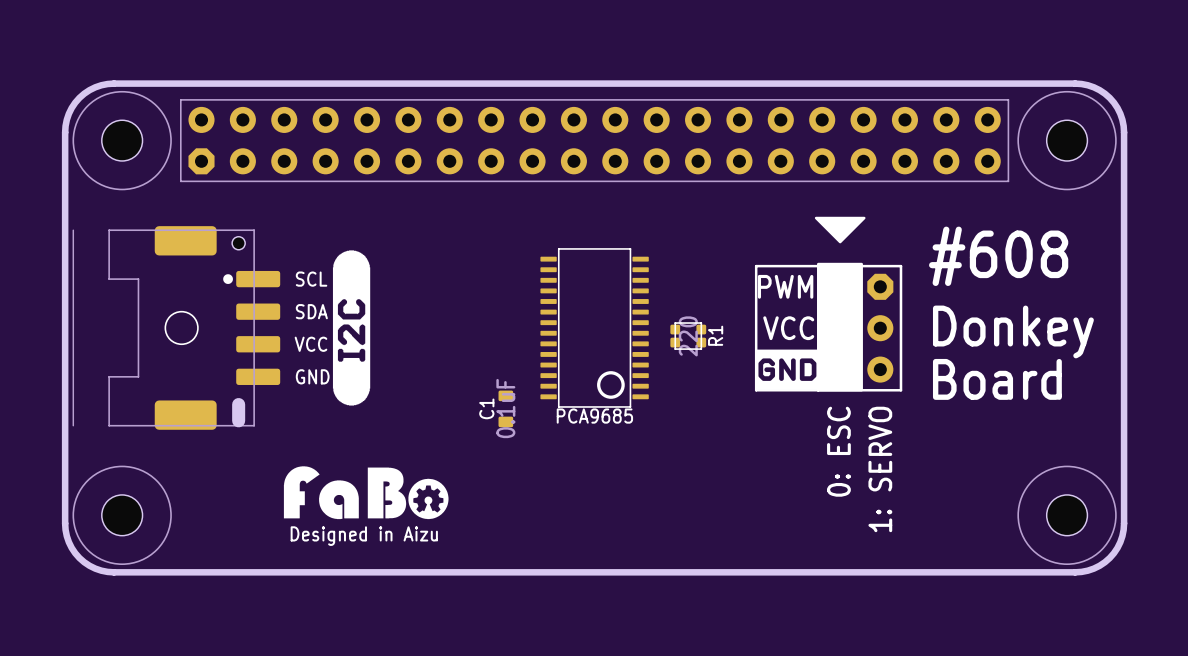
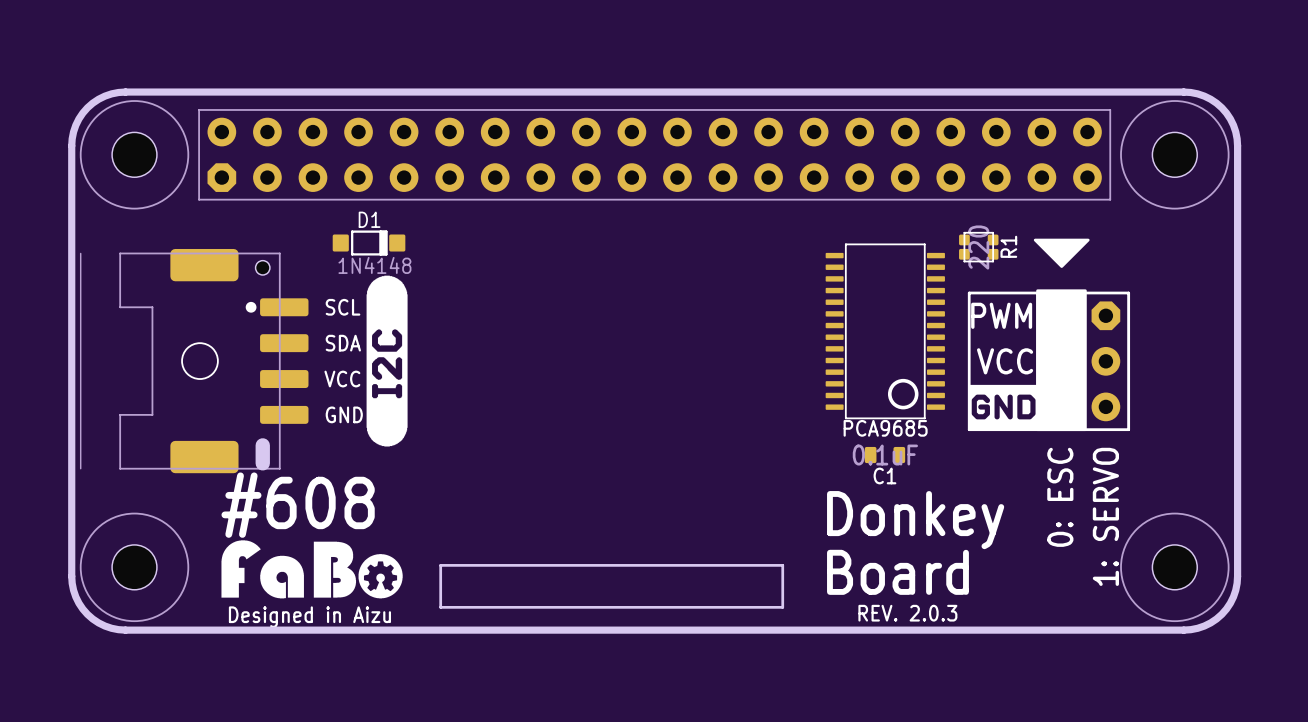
D1: none -> 1N4148 (369, 243)
drawing position: (840, 230) -> (1061, 253)
text: #608 (998, 256) -> none
drawing: [817, 262, 863, 392] -> none
drawing: none -> [1036, 289, 1087, 432]
line: (880, 266) (756, 266) (756, 390) (880, 390) -> (969, 293) (969, 429)
line: (901, 266) (901, 390) -> (992, 293) (1128, 293) (1128, 429) (992, 429)
text position: PWM (785, 286) -> PWM (1001, 315)
PCA9685 position: (594, 327) -> (885, 331)
text position: VCC (788, 328) -> VCC (1005, 361)
part: (880, 328) -> none
part: none -> (1105, 361)
text position: Donkey (1013, 331) -> Donkey (915, 520)
R1 position: (688, 336) -> (978, 247)
drawing position: (787, 369) -> (1003, 407)
text position: Board (997, 379) -> Board (897, 572)
C1 rotation: 0° (505, 408) -> 90° clockwise (884, 455)
C1 position: (505, 408) -> (884, 455)
text position: 0: ESC (838, 451) -> 0: ESC (1060, 497)
text: none -> #608 (298, 505)
text position: 1: SERVO (880, 469) -> 1: SERVO (1105, 516)
drawing position: (366, 492) -> (312, 569)
board edge: none -> (440, 565) (782, 565) (782, 607) (440, 607) (440, 565)
text position: Designed in Aizu (364, 536) -> Designed in Aizu (309, 617)
text: none -> REV. 2.0.3 (907, 613)

